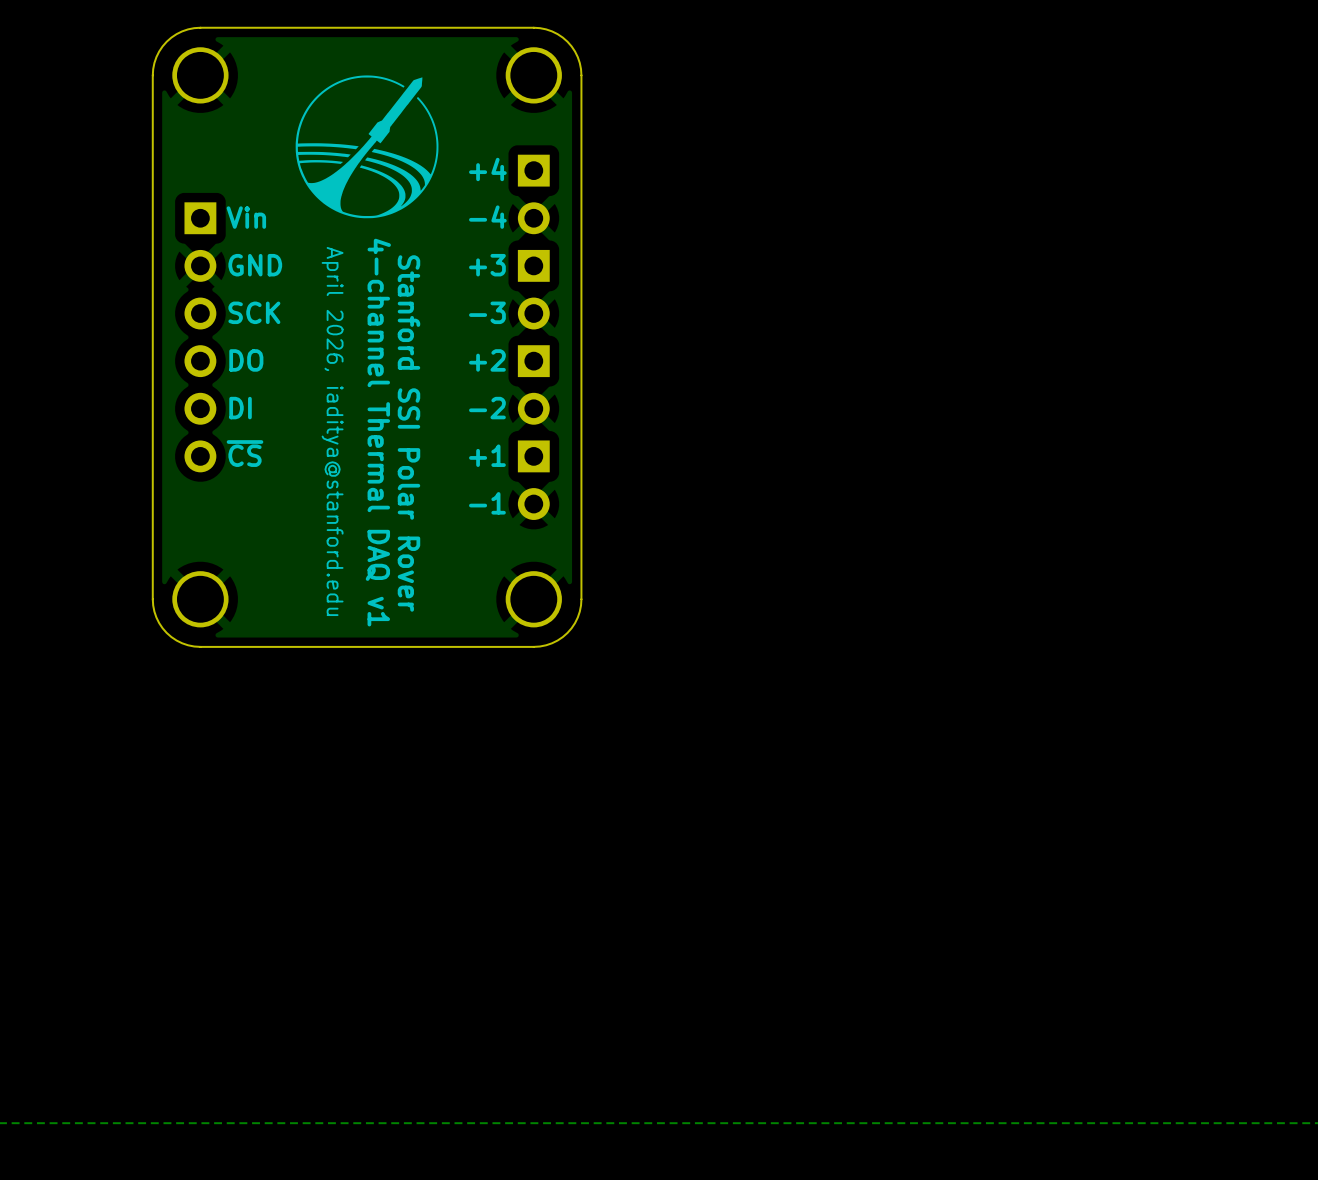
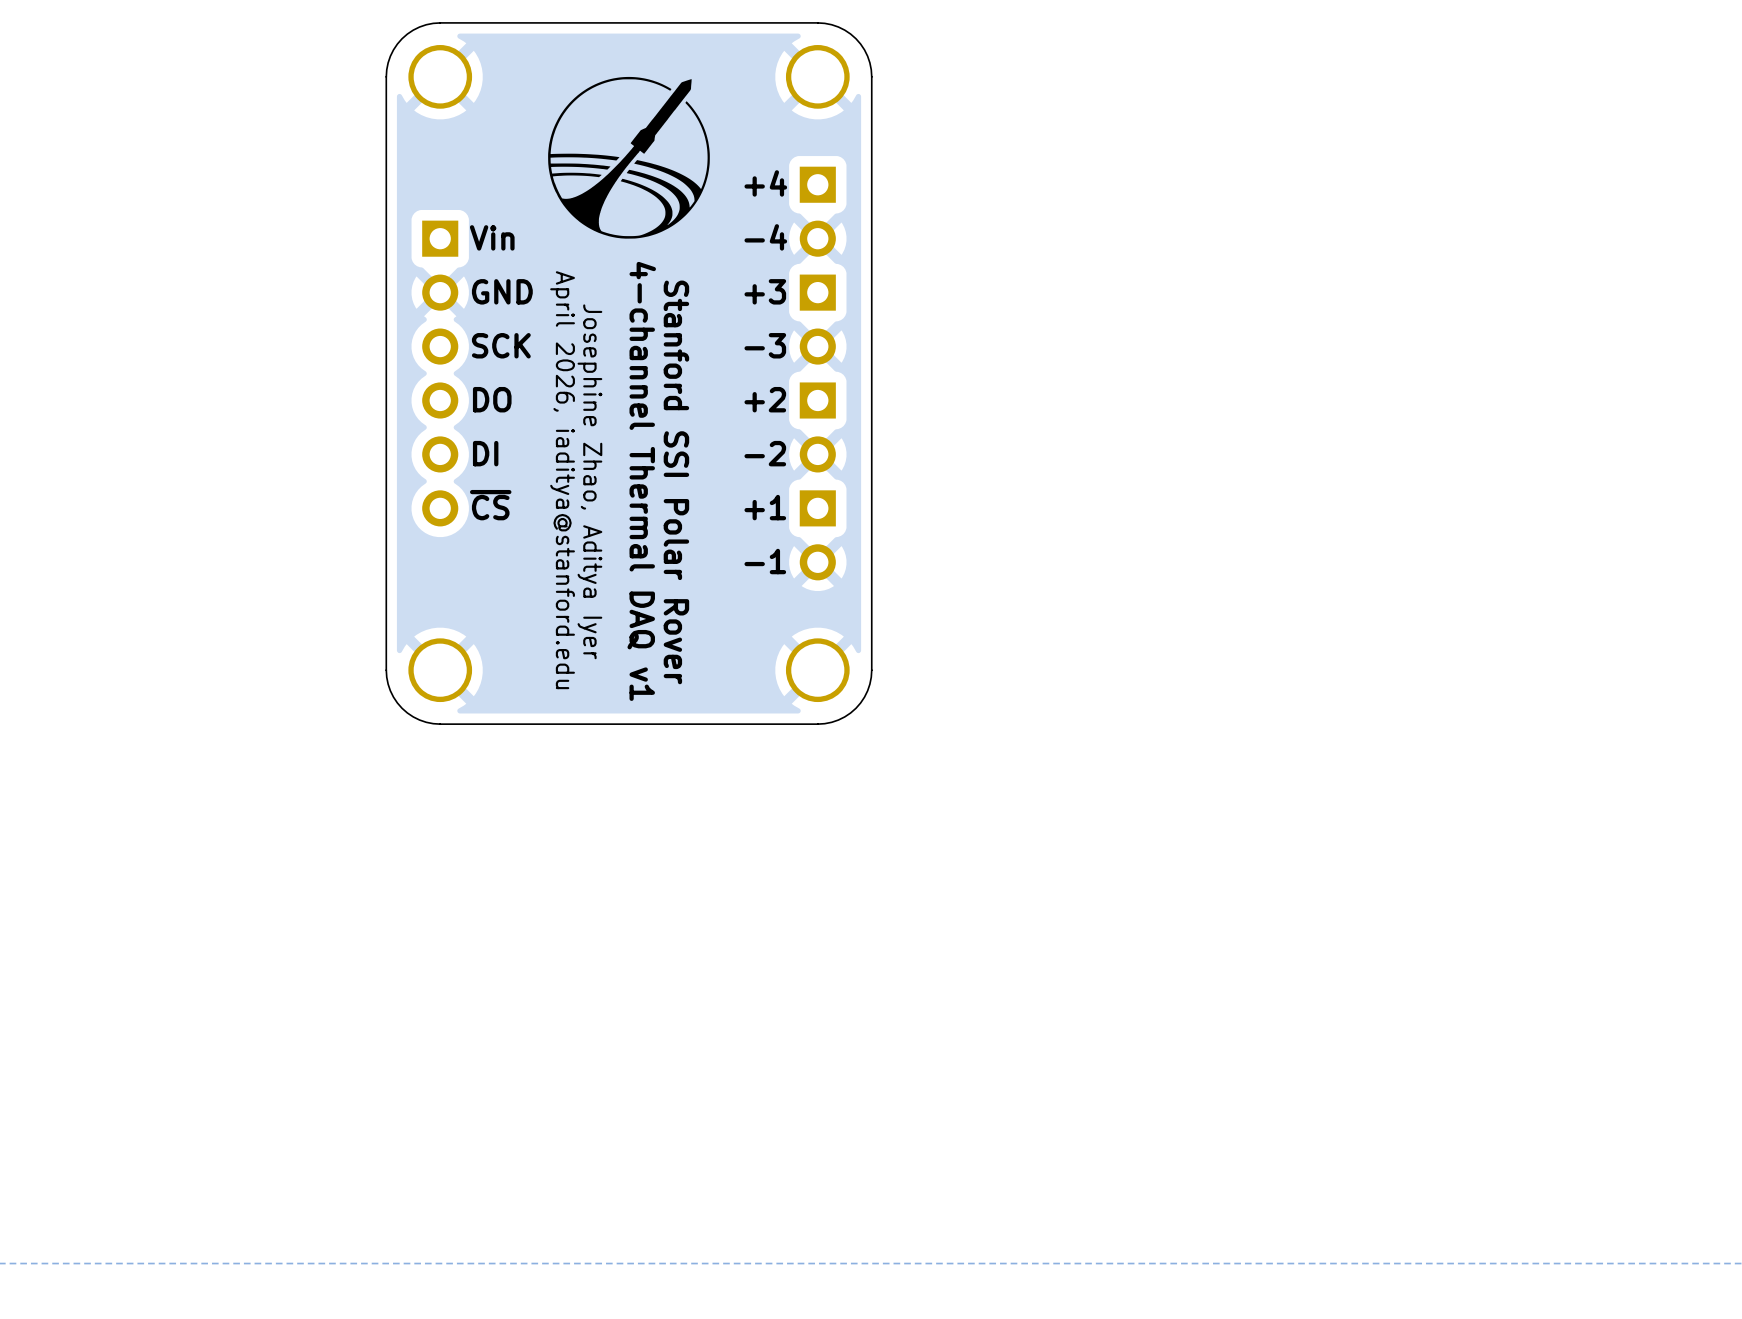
text: none -> April 2026, iaditya@stanford.edu (562, 480)
text: April 2026, iaditya@stanford.edu (332, 431) -> Josephine Zhao, Aditya Iyer (589, 481)

